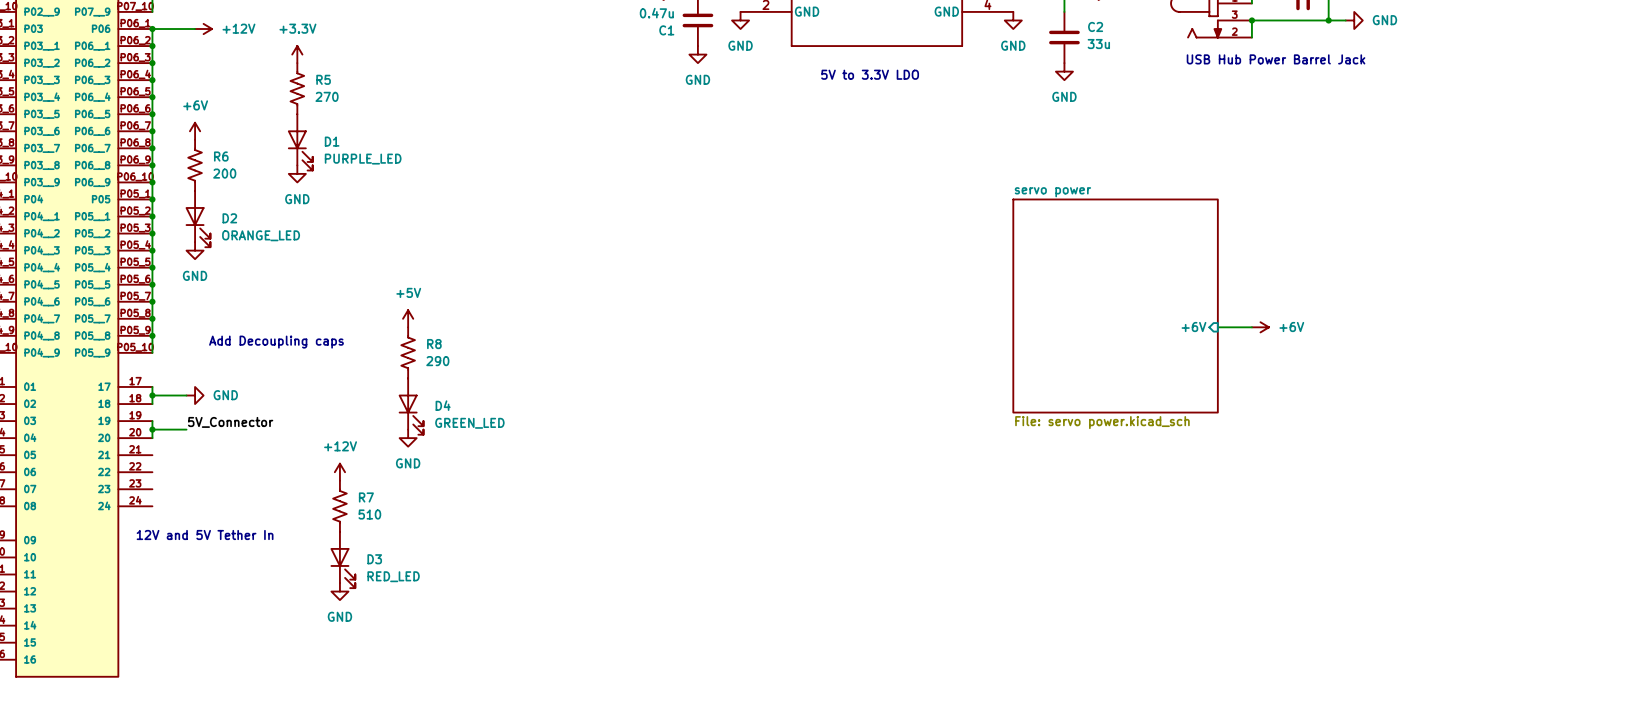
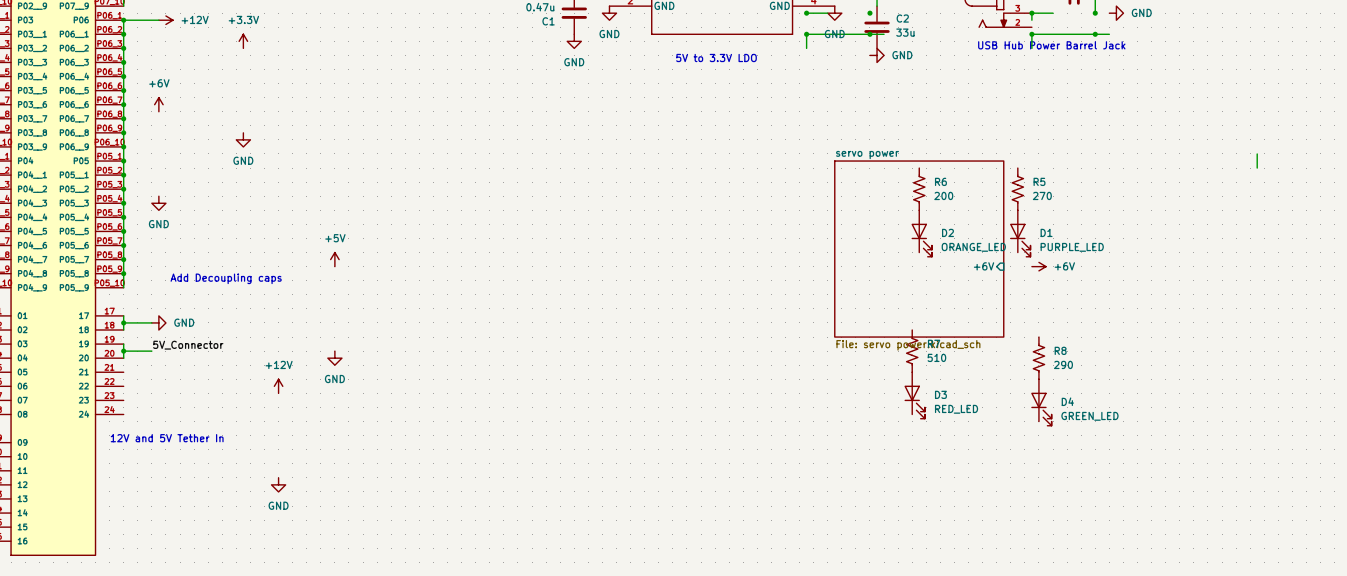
wire: none -> (806, 13) (827, 13)
junction: none -> (806, 13)
junction: none -> (869, 13)
wire: (1277, 20) (1345, 20) -> none
wire: (1251, 29) (1251, 37) -> none
junction: none -> (806, 34)
junction: none -> (869, 34)
wire: none -> (884, 34) (806, 34) (806, 48)
junction: none -> (1031, 34)
junction: none -> (1095, 34)
wire: none -> (1109, 34) (1031, 34) (1031, 48)
power symbol rotation: 0° (1064, 71) -> 90° counterclockwise (877, 55)
R5 position: (297, 88) -> (1017, 189)
D1 position: (300, 142) -> (1020, 233)
R6 position: (195, 165) -> (919, 189)
wire: none -> (1257, 153) (1257, 168)
D2 position: (198, 219) -> (921, 233)
wire: (1217, 327) (1251, 327) -> none
R8 position: (408, 352) -> (1038, 358)
D4 position: (411, 406) -> (1041, 402)
R7 position: (339, 506) -> (912, 351)
D3 position: (342, 560) -> (914, 395)

